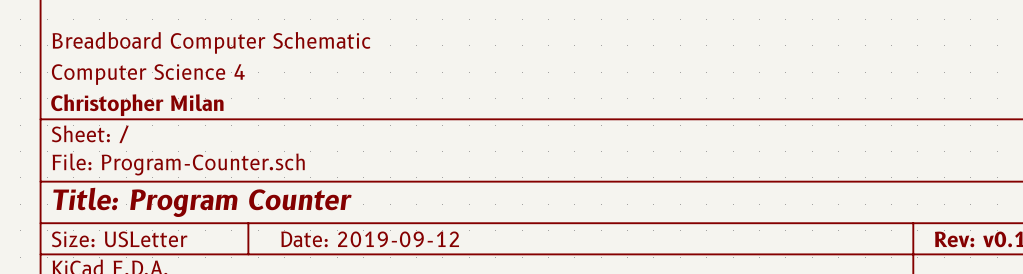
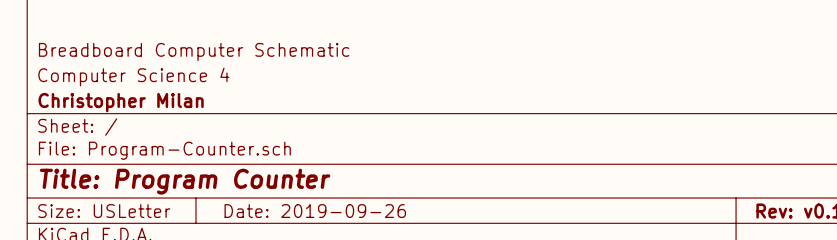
title block: Date: 2019-09-12 (370, 239) -> Date: 2019-09-26 (315, 211)

